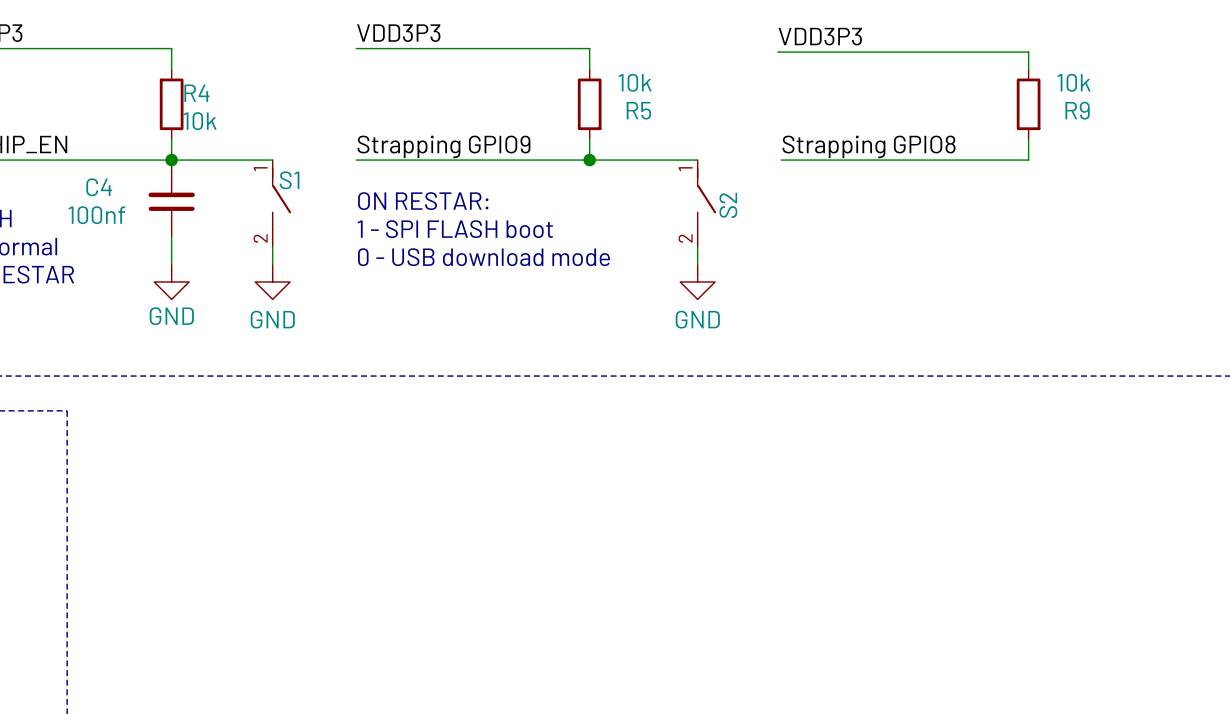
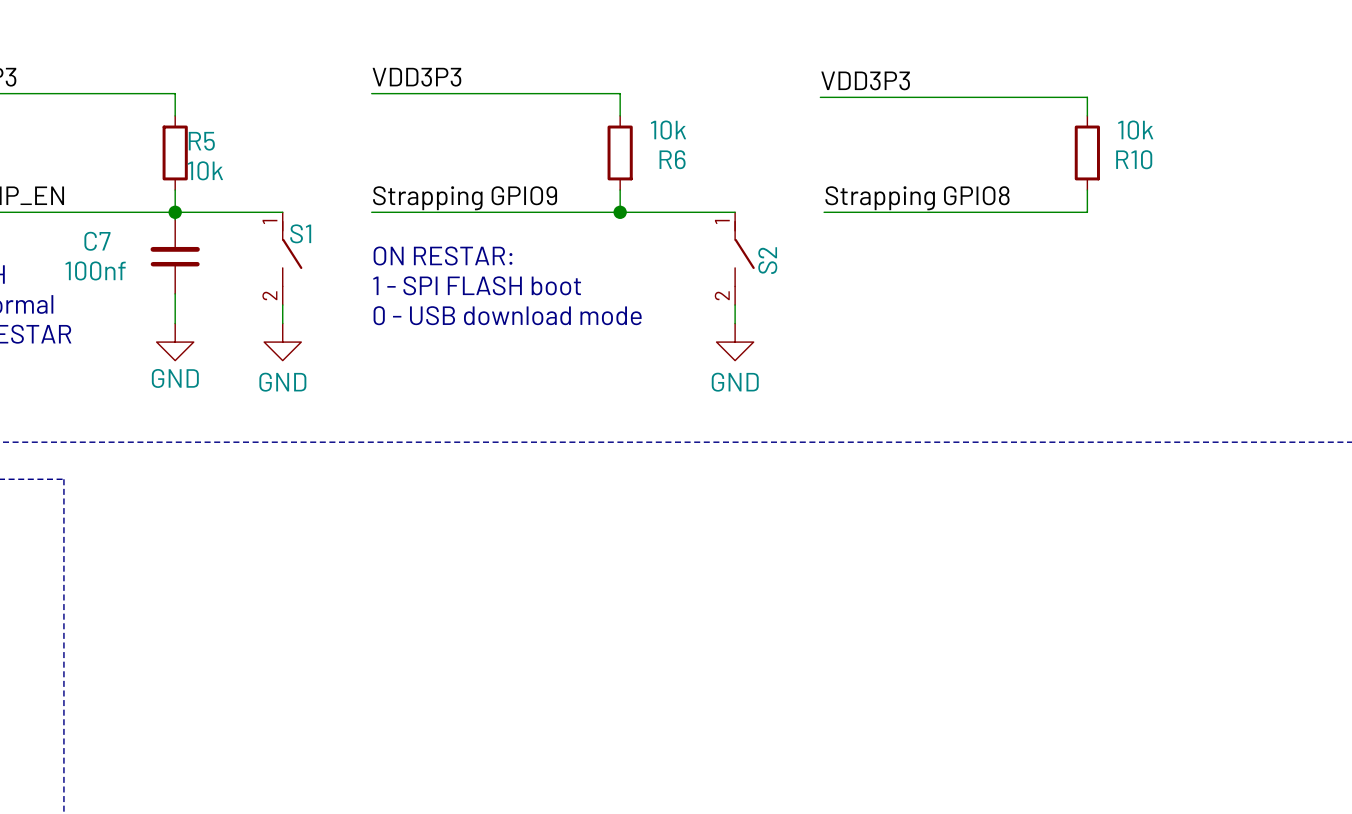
R4 name: R4 (196, 93) -> R5 (201, 141)
R5 name: R5 (638, 110) -> R6 (672, 159)
R9 name: R9 (1077, 110) -> R10 (1134, 159)
C4 name: C4 (99, 187) -> C7 (97, 241)

